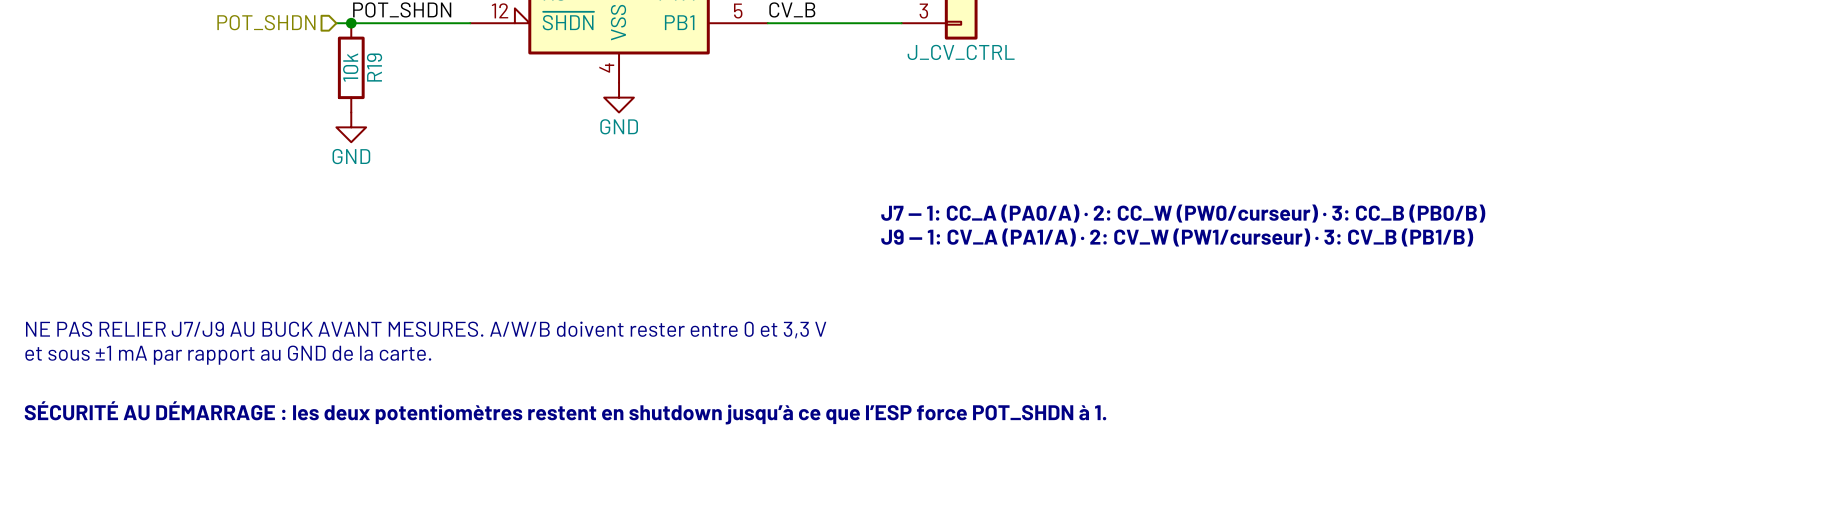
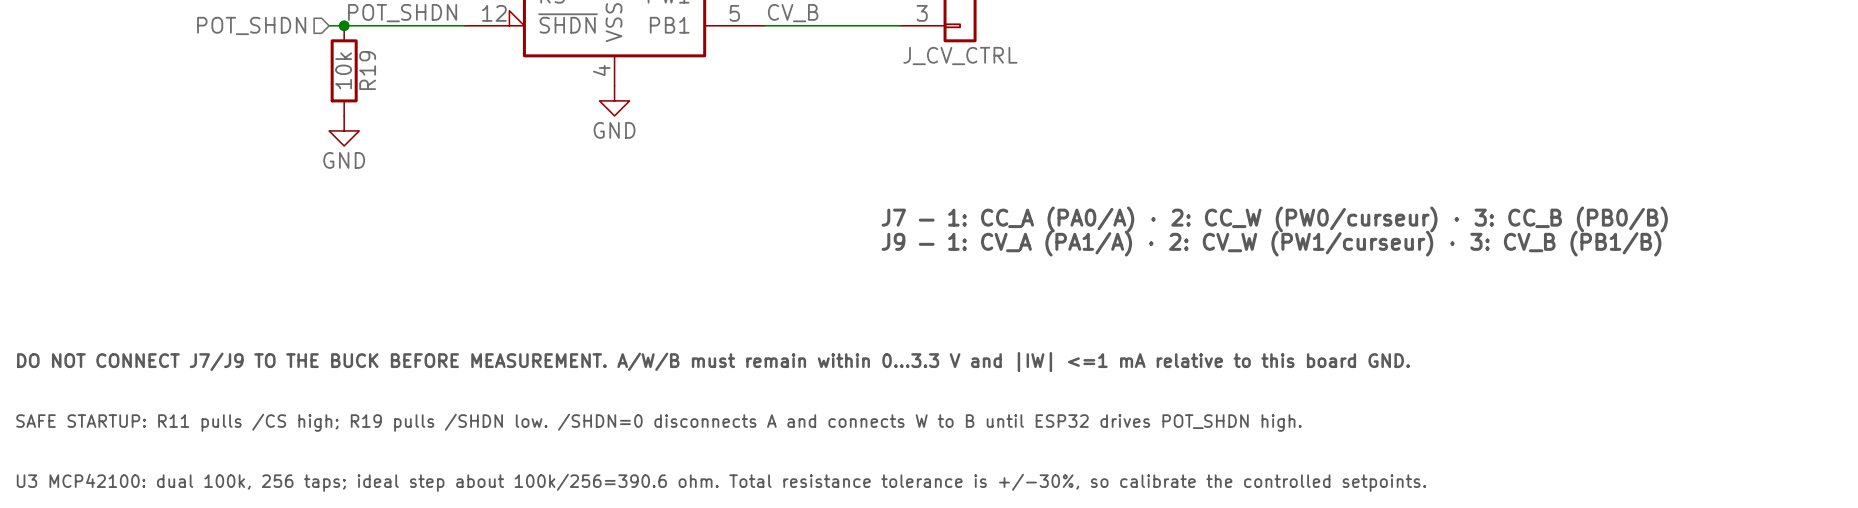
text: NE PAS RELIER J7/J9 AU BUCK AVANT MESURES. A/W/B doivent rester entre 0 et 3,3 V (426, 329) -> none
text: et sous ±1 mA par rapport au GND de la carte. (228, 355) -> DO NOT CONNECT J7/J9 TO THE BUCK BEFORE MEASUREMENT. A/W/B must remain within 0...3.3 V and |IW| <=1 mA relative to this board GND. (713, 362)
text: SÉCURITÉ AU DÉMARRAGE : les deux potentiomètres restent en shutdown jusqu’à ce que l’ESP force POT_SHDN à 1. (565, 412) -> SAFE STARTUP: R11 pulls /CS high; R19 pulls /SHDN low. /SHDN=0 disconnects A and connects W to B until ESP32 drives POT_SHDN high. (658, 422)
text: none -> U3 MCP42100: dual 100k, 256 taps; ideal step about 100k/256=390.6 ohm. Total resistance tolerance is +/-30%, so calibrate the controlled setpoints. (721, 482)

